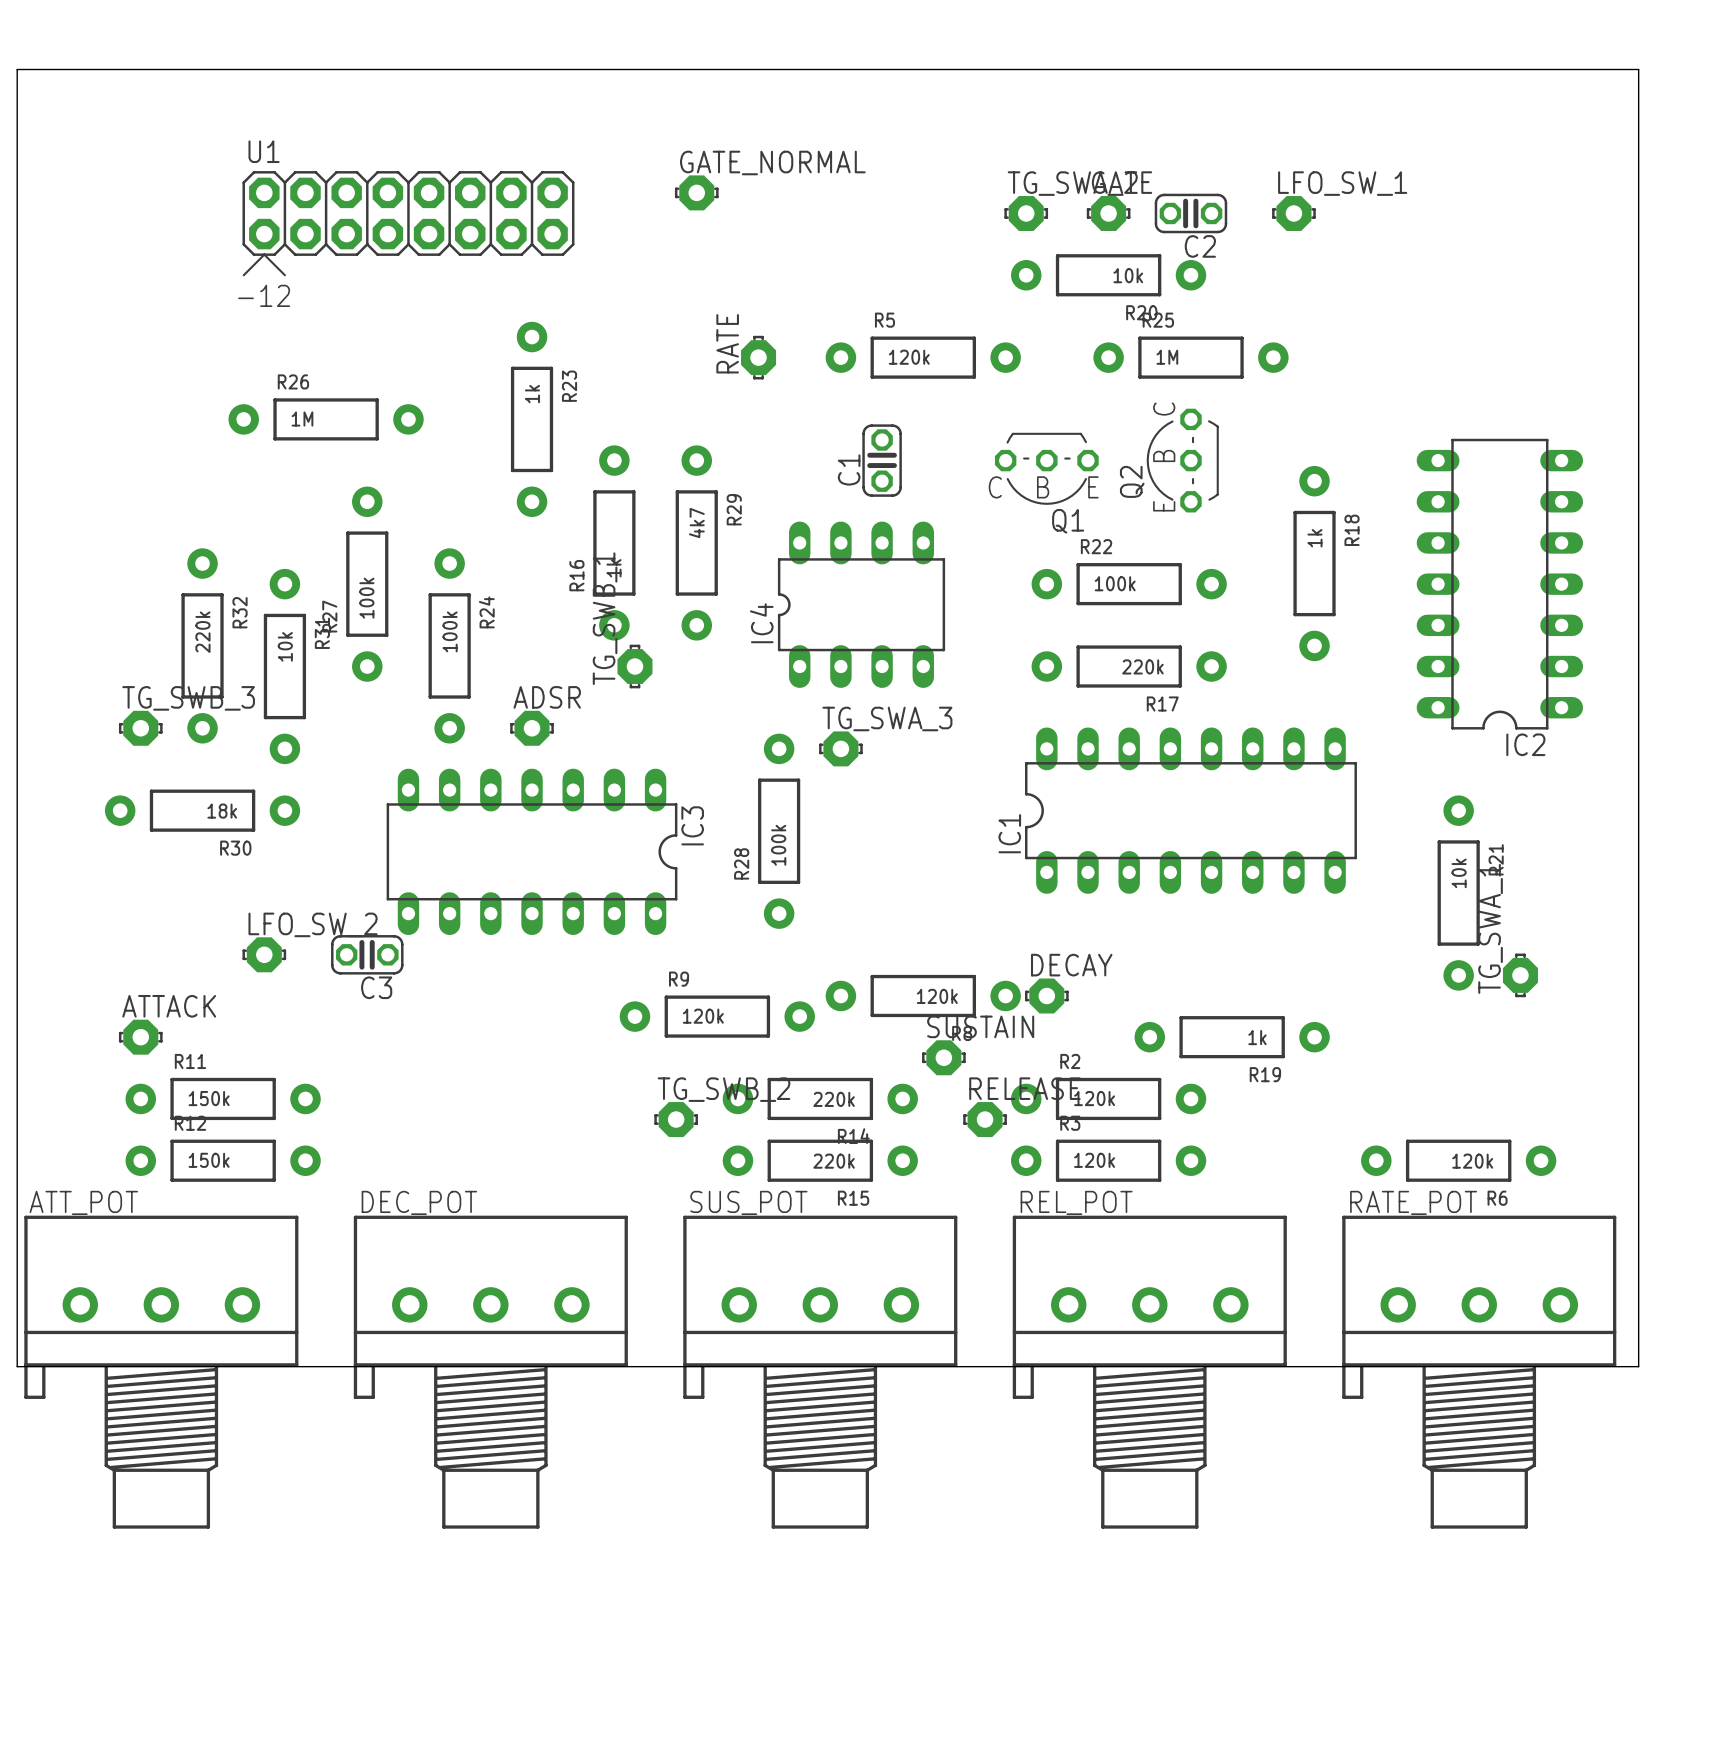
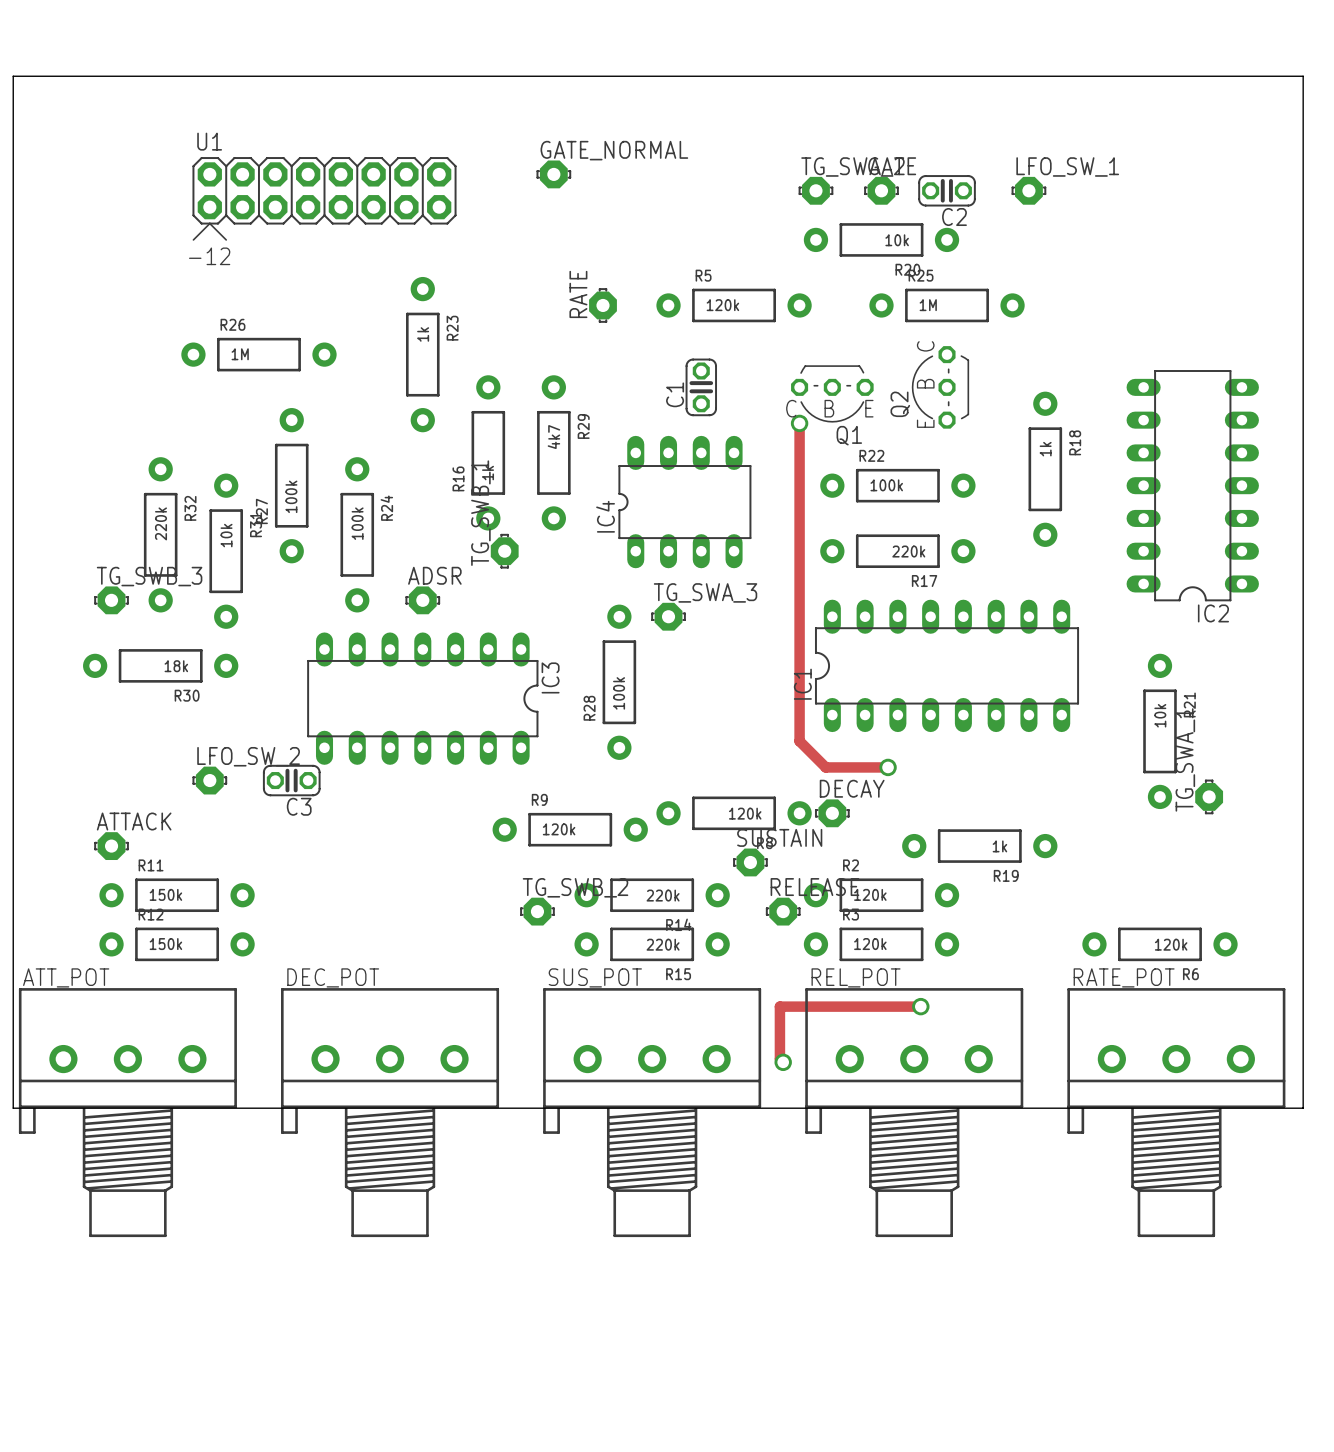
track: none -> (799, 423) (799, 741) (825, 767) (888, 767)
via: none -> (799, 423)
via: none -> (888, 767)
track: none -> (920, 1006) (779, 1006) (779, 1059) (783, 1062)
via: none -> (920, 1006)
via: none -> (783, 1062)

